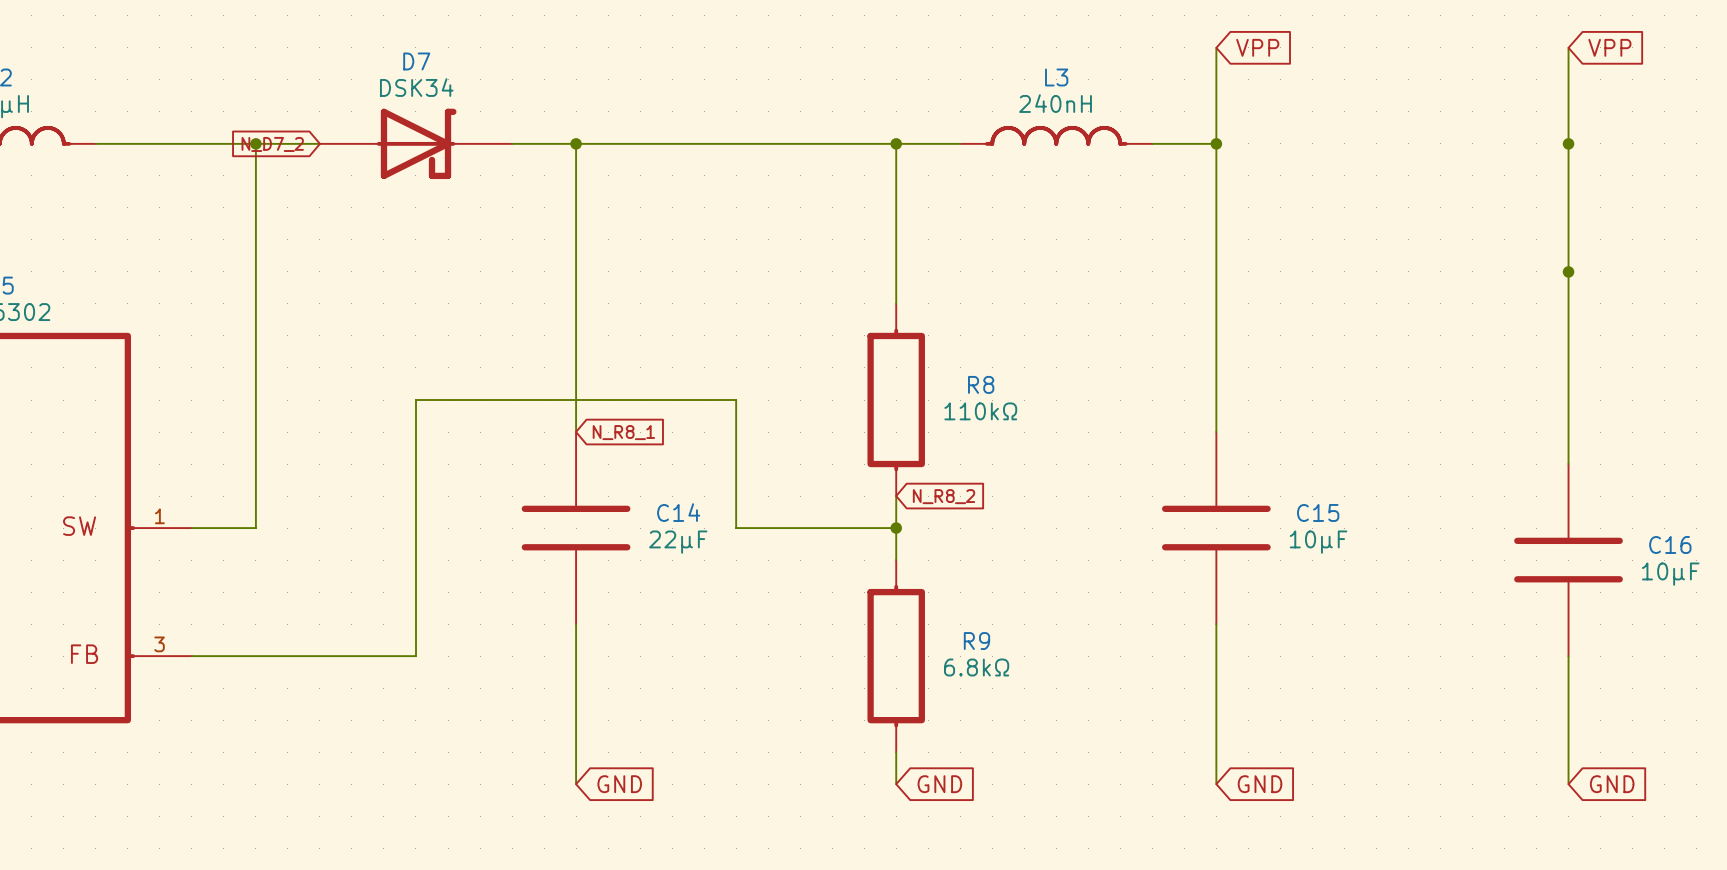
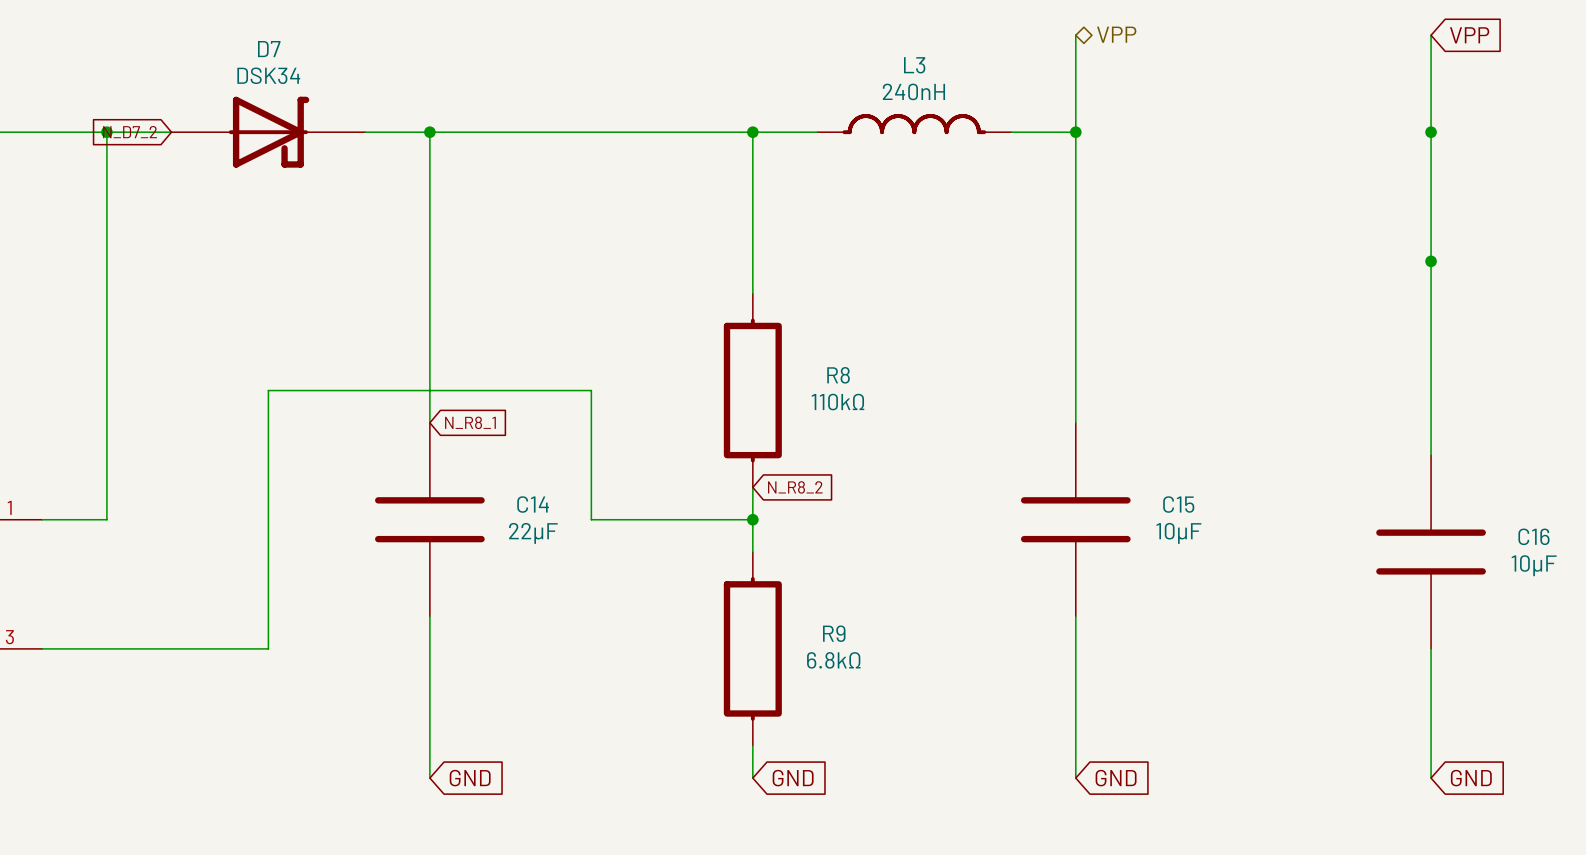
global label: VPP (1257, 47) -> none
hierarchical label: none -> VPP (1116, 34)

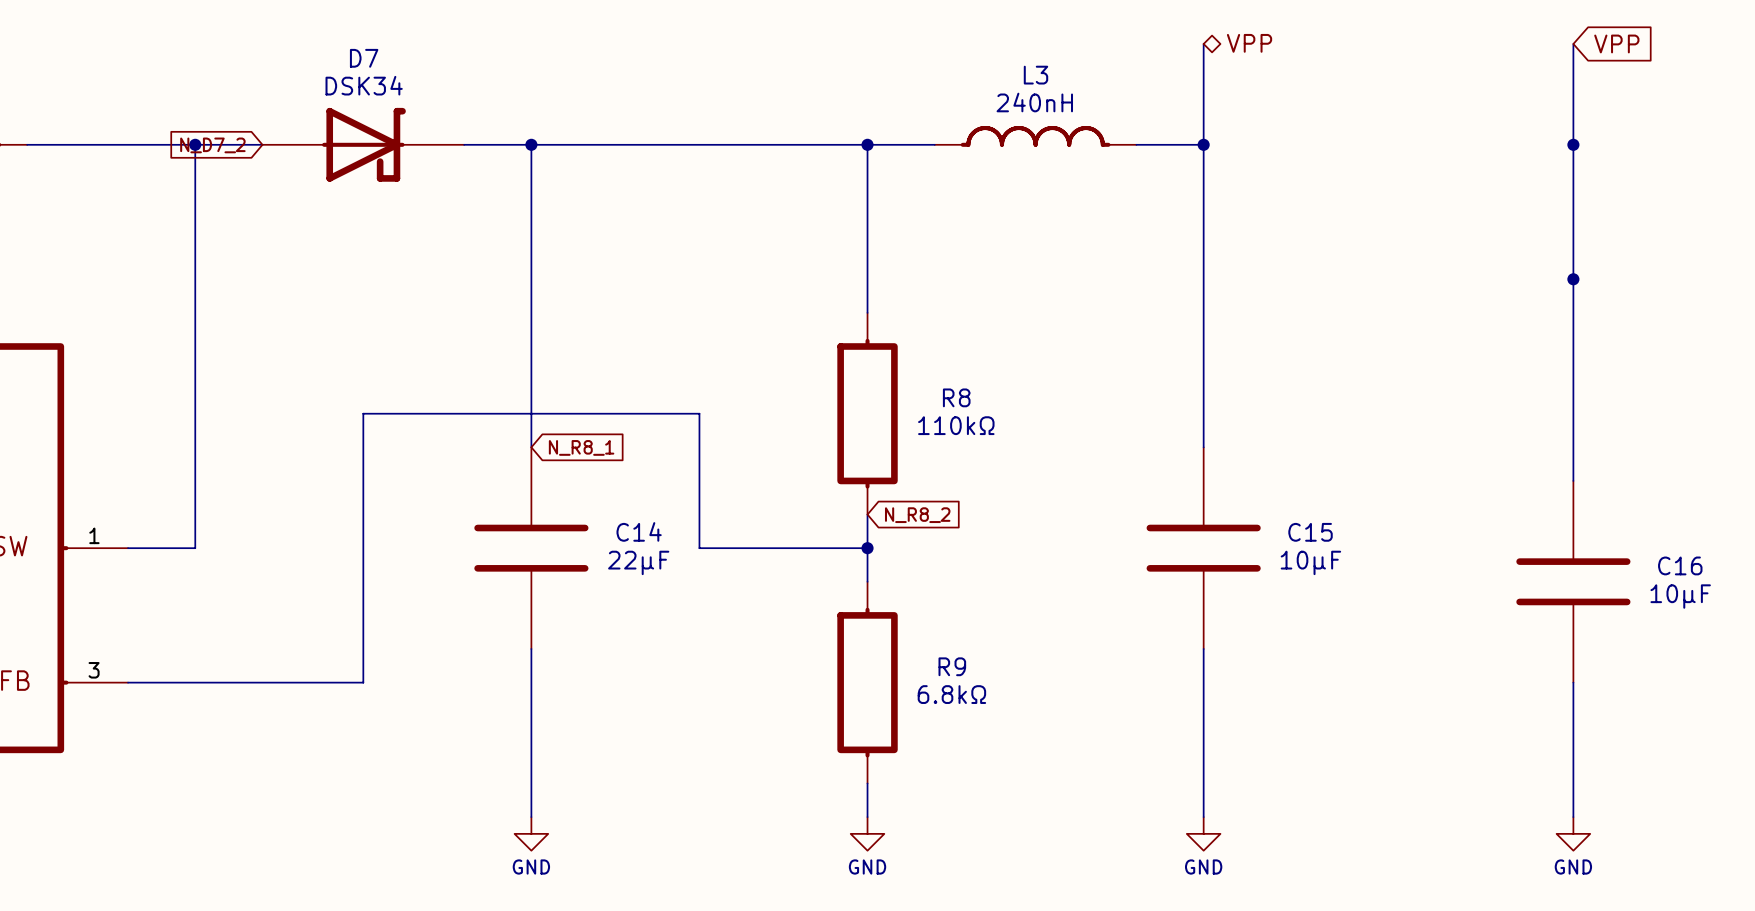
global label: GND (470, 778) -> none
global label: GND (793, 778) -> none
global label: GND (1116, 778) -> none
global label: GND (1471, 778) -> none
power symbol: none -> GND (531, 833)
power symbol: none -> GND (867, 833)
power symbol: none -> GND (1203, 833)
power symbol: none -> GND (1573, 833)

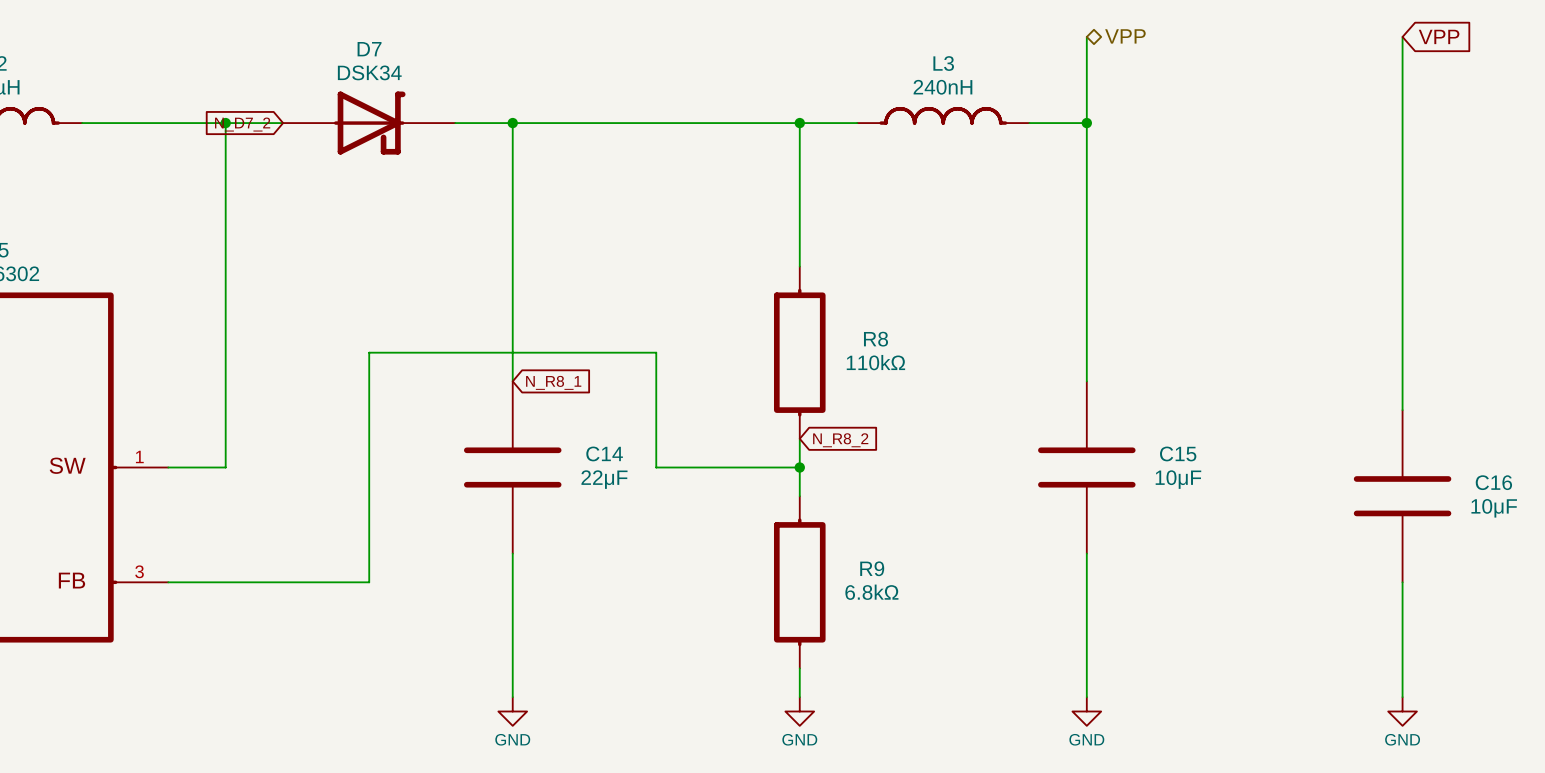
junction: (1573, 144) -> none
junction: (1573, 279) -> none

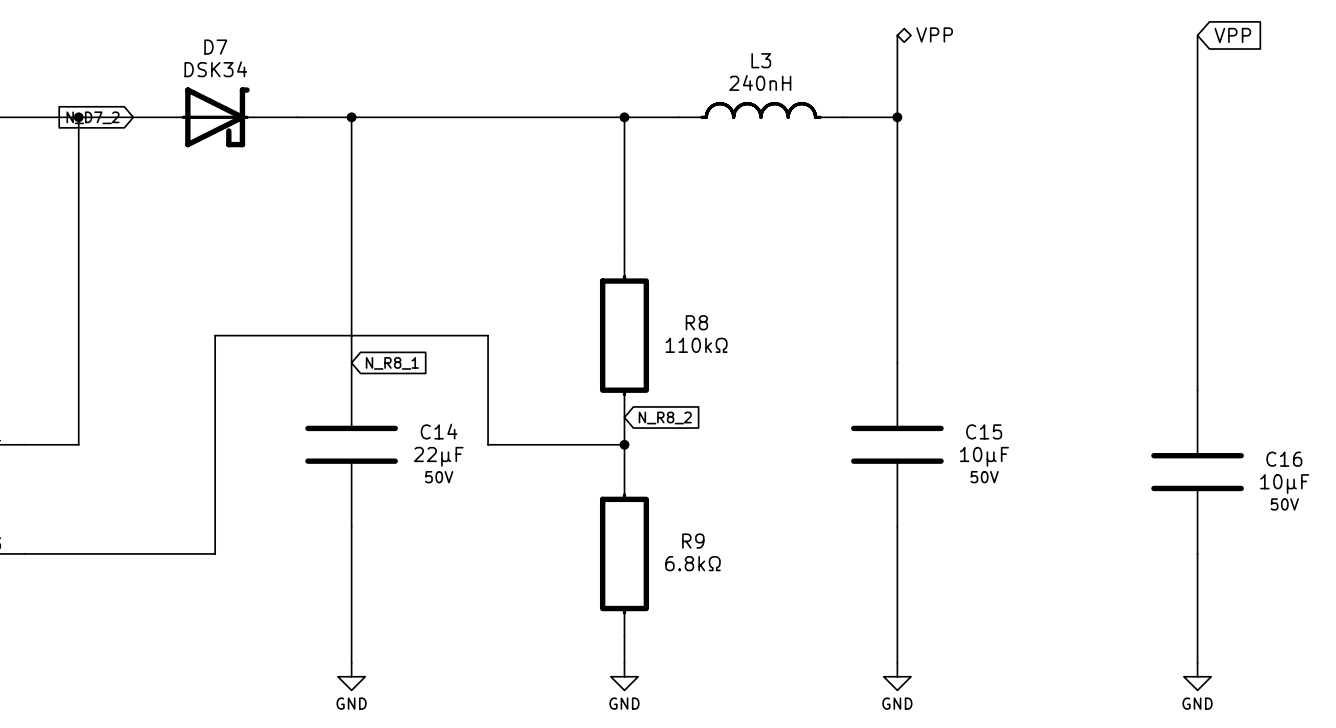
C14 text: none -> 50V (439, 477)
C15 text: none -> 50V (984, 477)
C16 text: none -> 50V (1284, 504)

